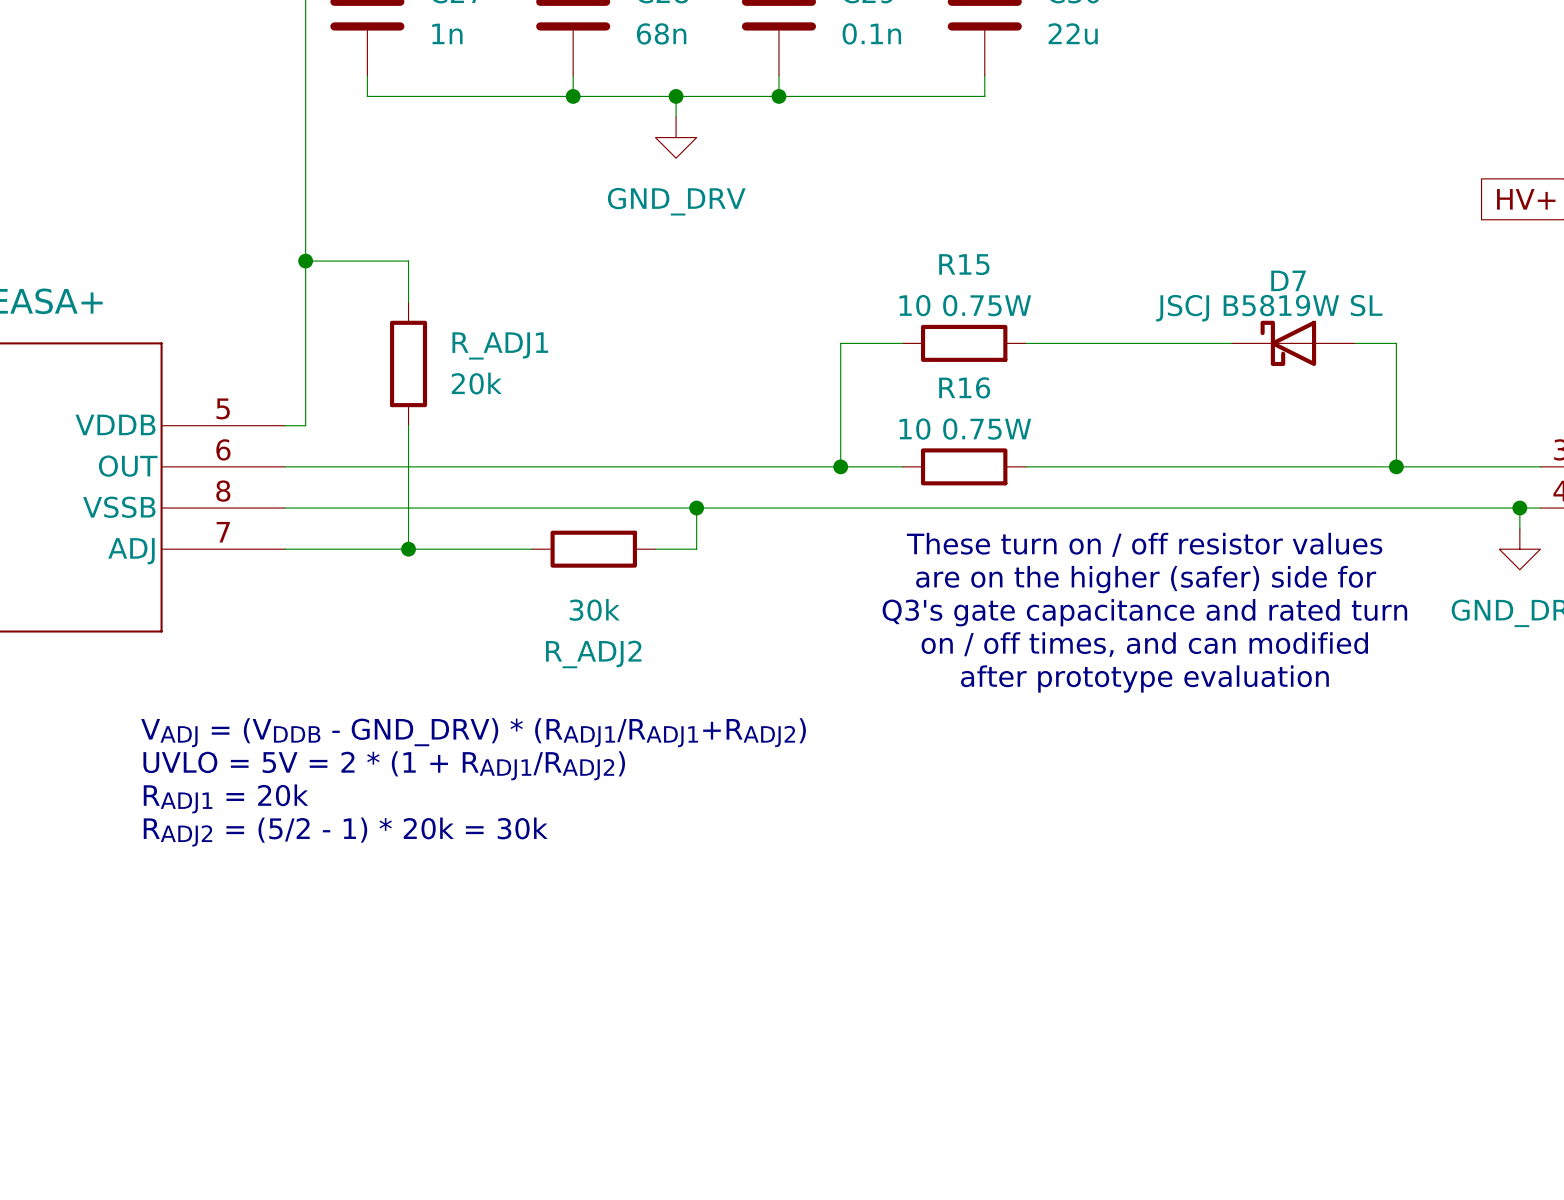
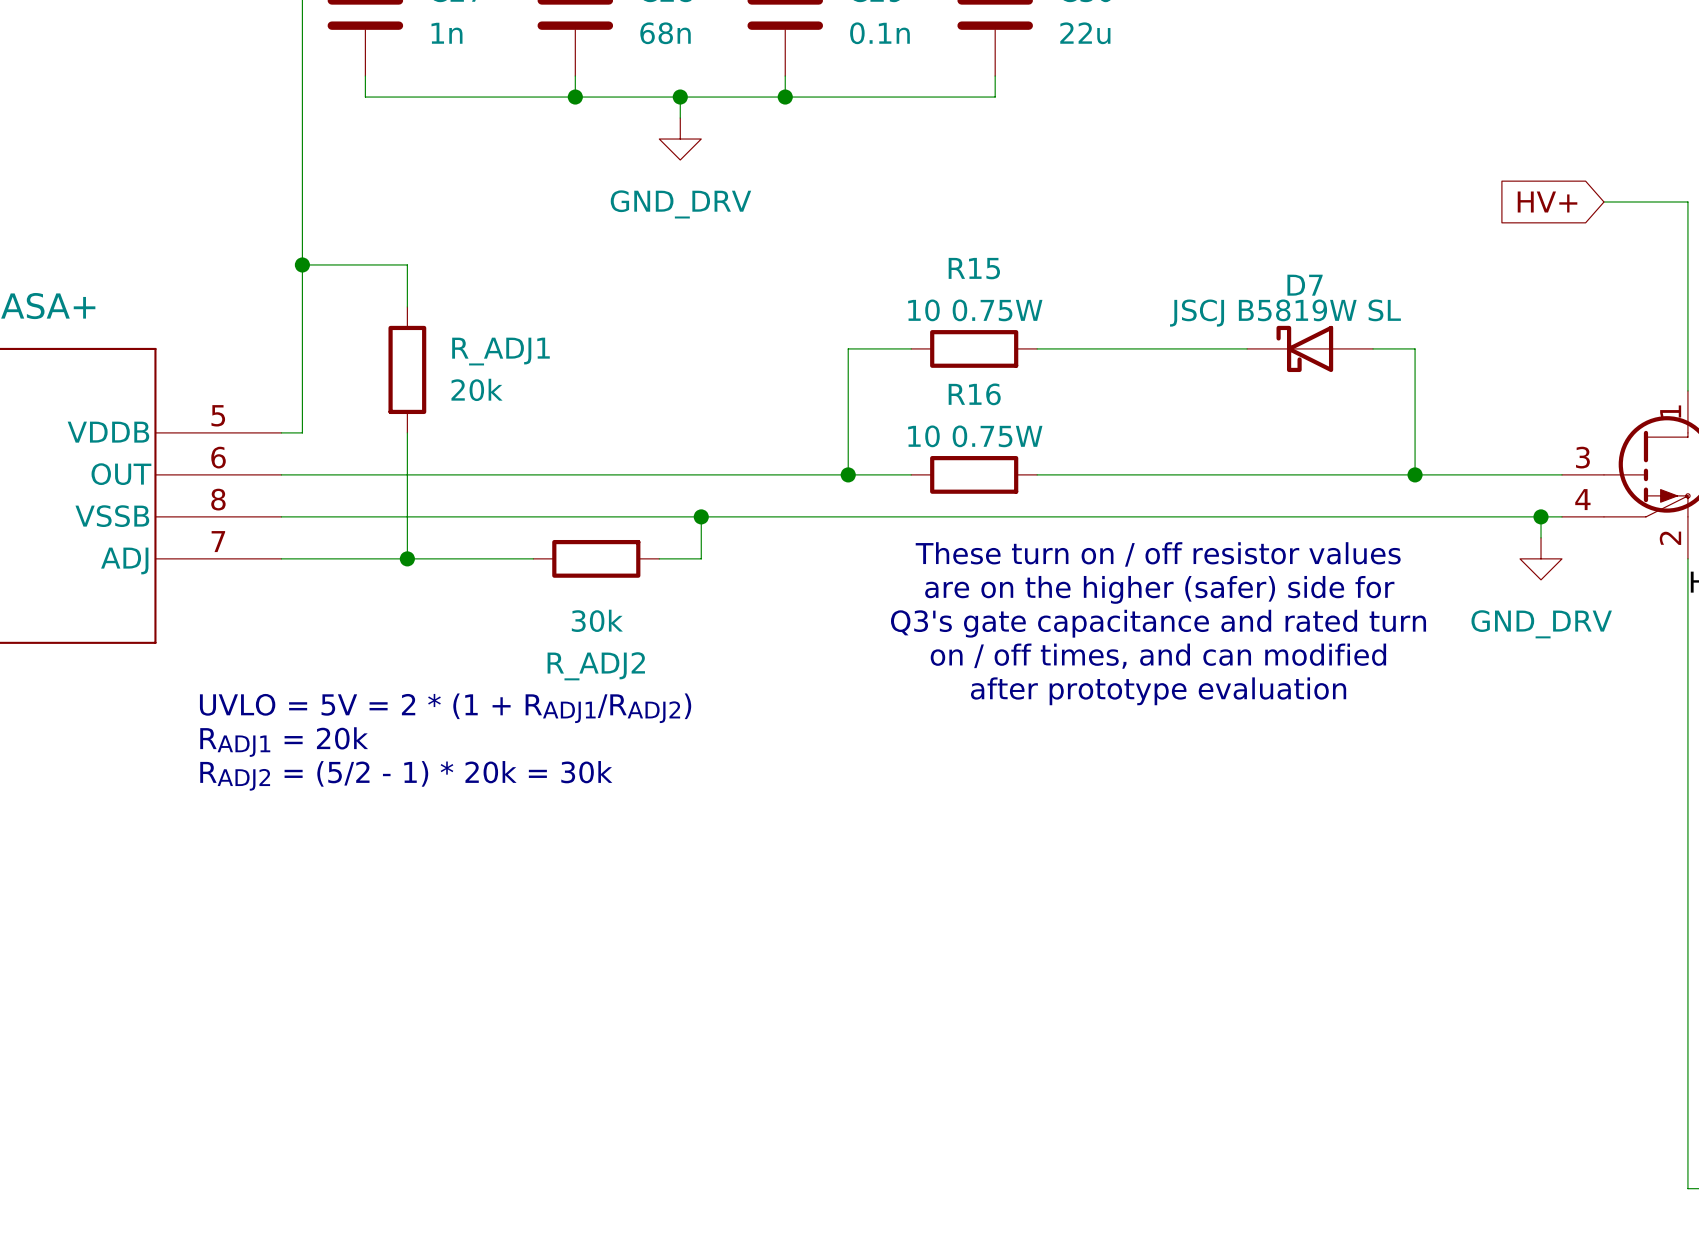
text: VADJ = (VDDB - GND_DRV) * (RADJ1/RADJ1+RADJ2) (473, 732) -> none
text position: UVLO = 5V = 2 * (1 + RADJ1/RADJ2) (384, 765) -> UVLO = 5V = 2 * (1 + RADJ1/RADJ2) (445, 708)
text position: RADJ1 = 20k (226, 798) -> RADJ1 = 20k (284, 742)
text position: RADJ2 = (5/2 - 1) * 20k = 30k (345, 832) -> RADJ2 = (5/2 - 1) * 20k = 30k (406, 775)

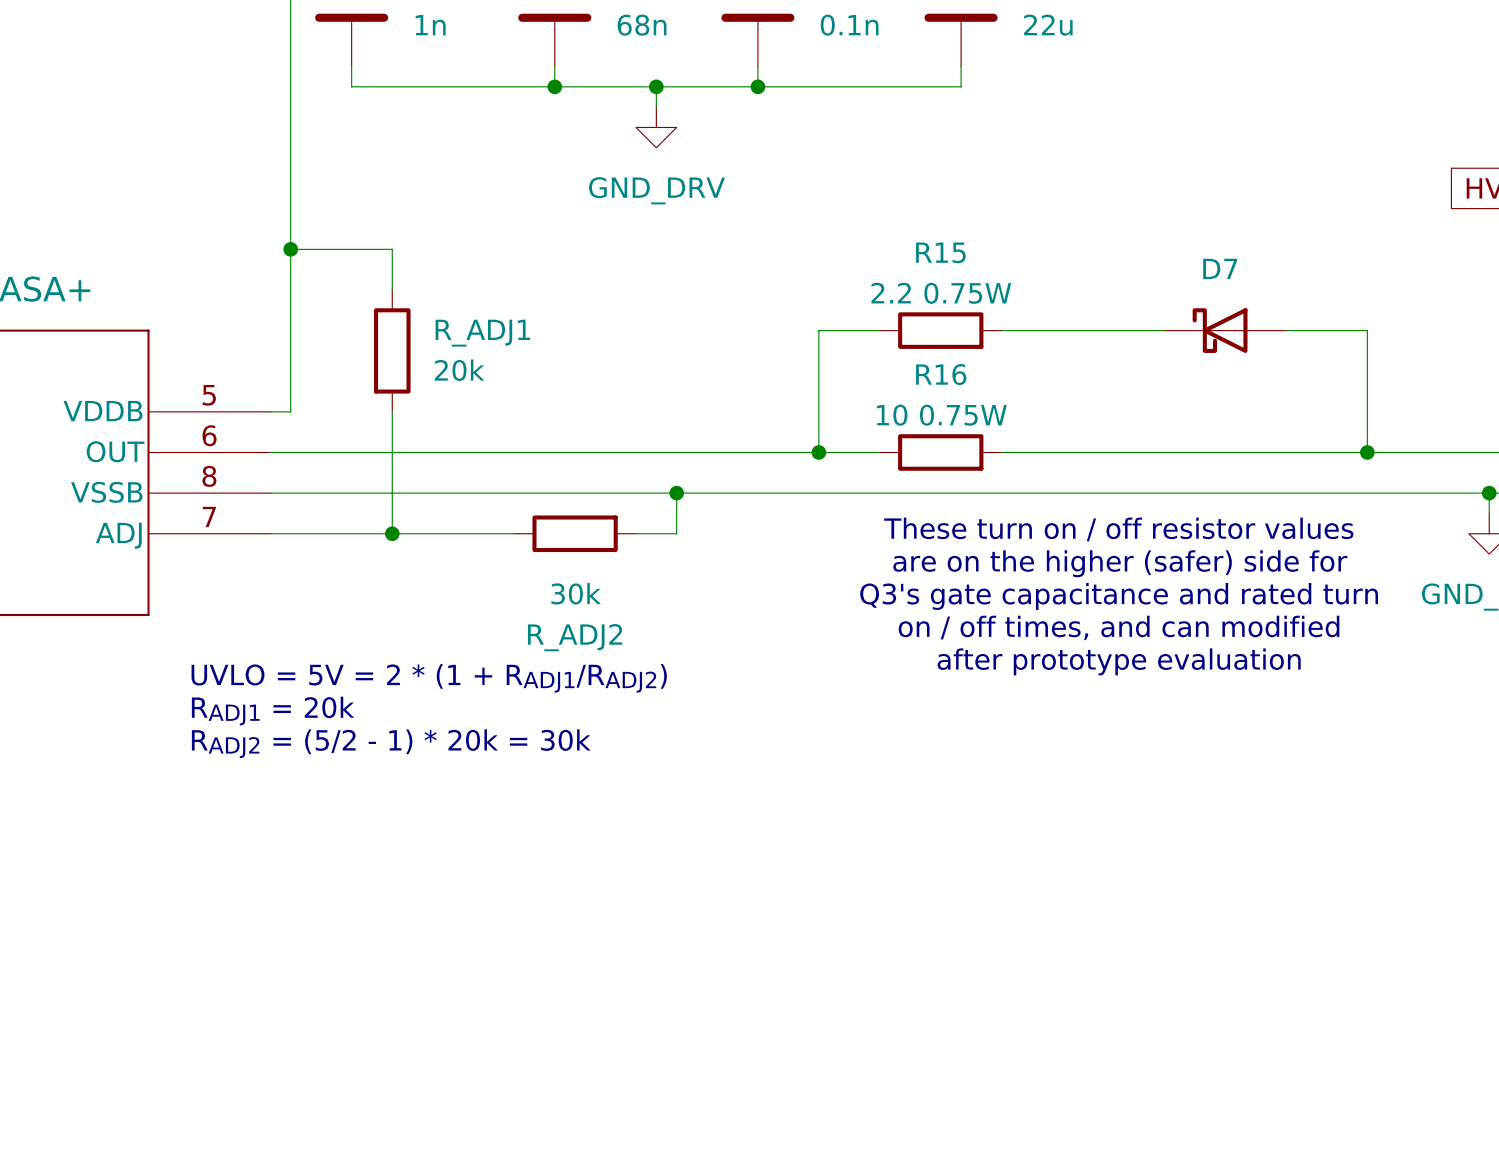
R15 value: 10 0.75W (975, 310) -> 2.2 0.75W (941, 293)
D7 value: JSCJ B5819W SL (1285, 313) -> none
D7 position: (1310, 348) -> (1225, 330)

